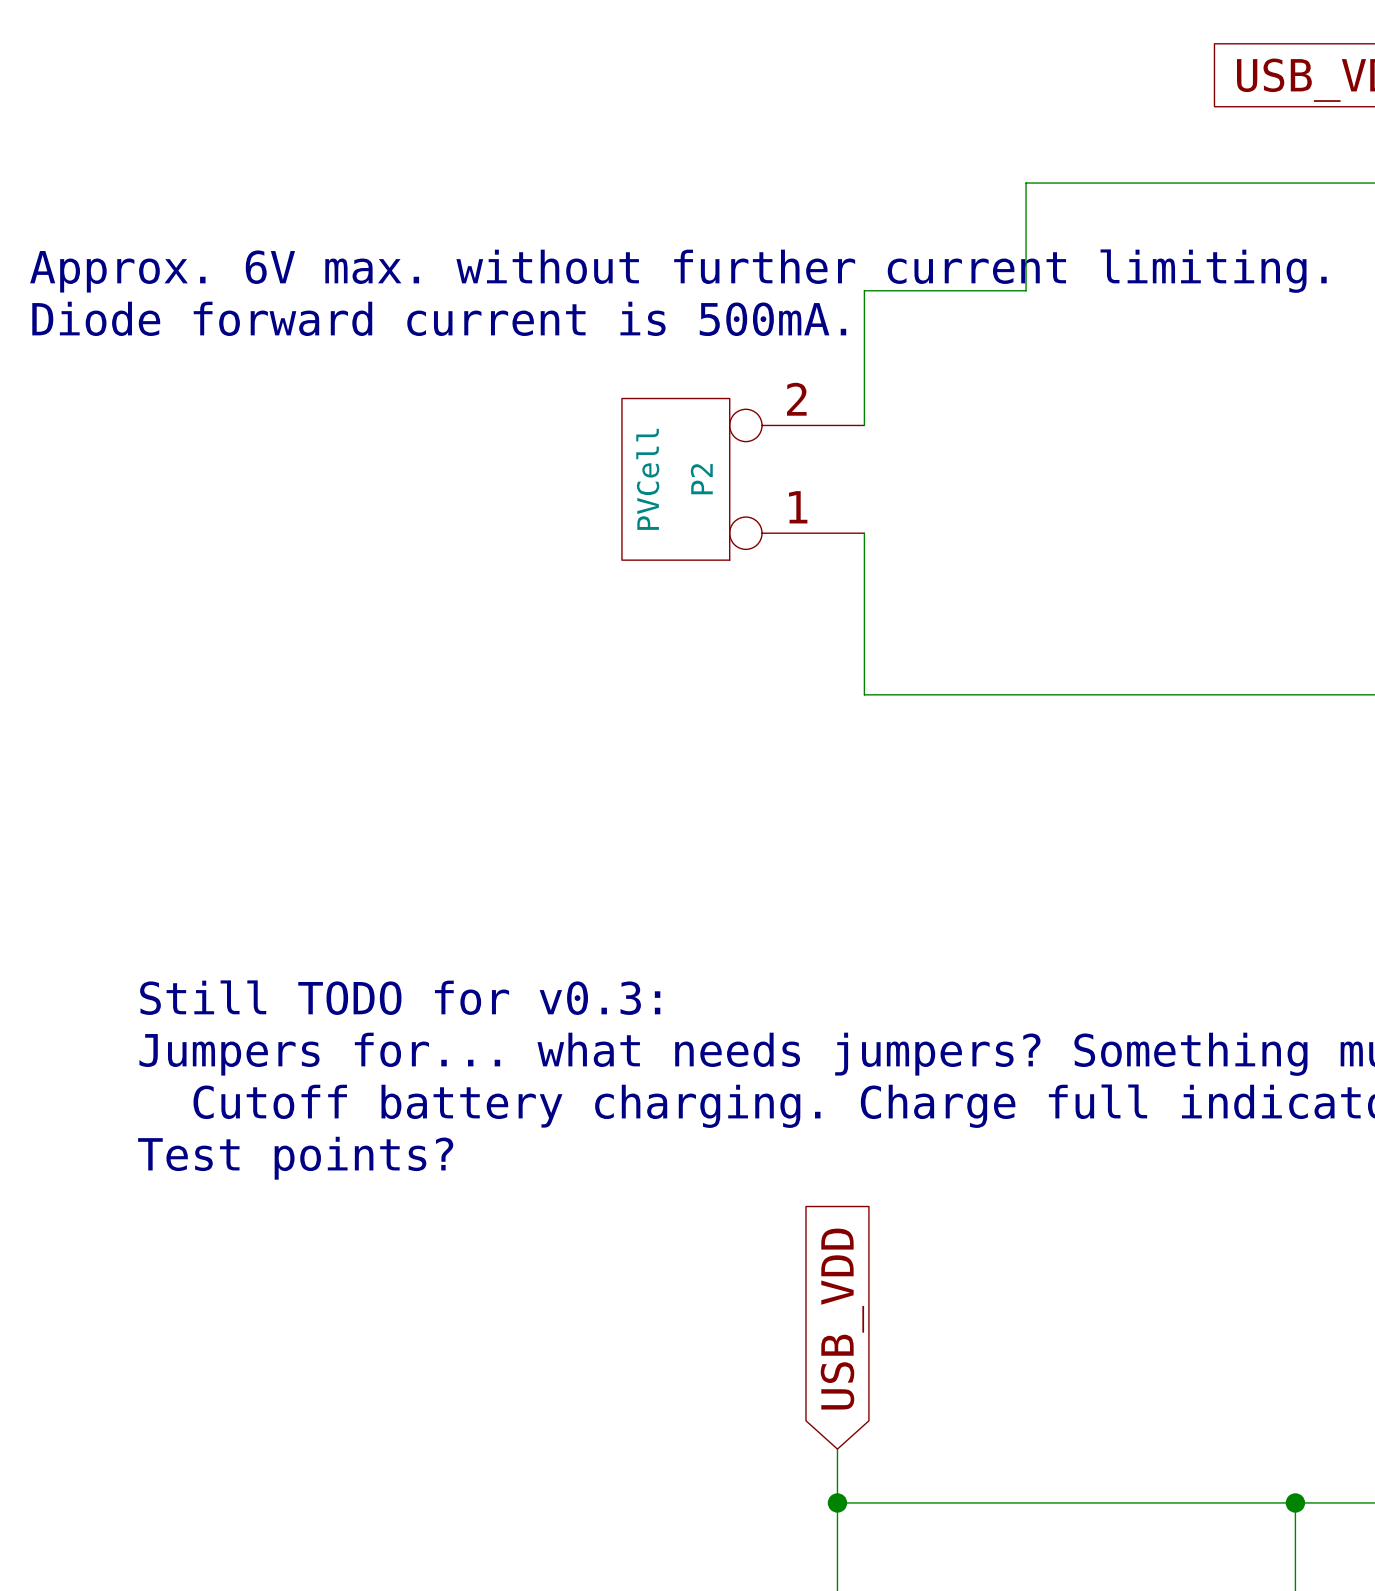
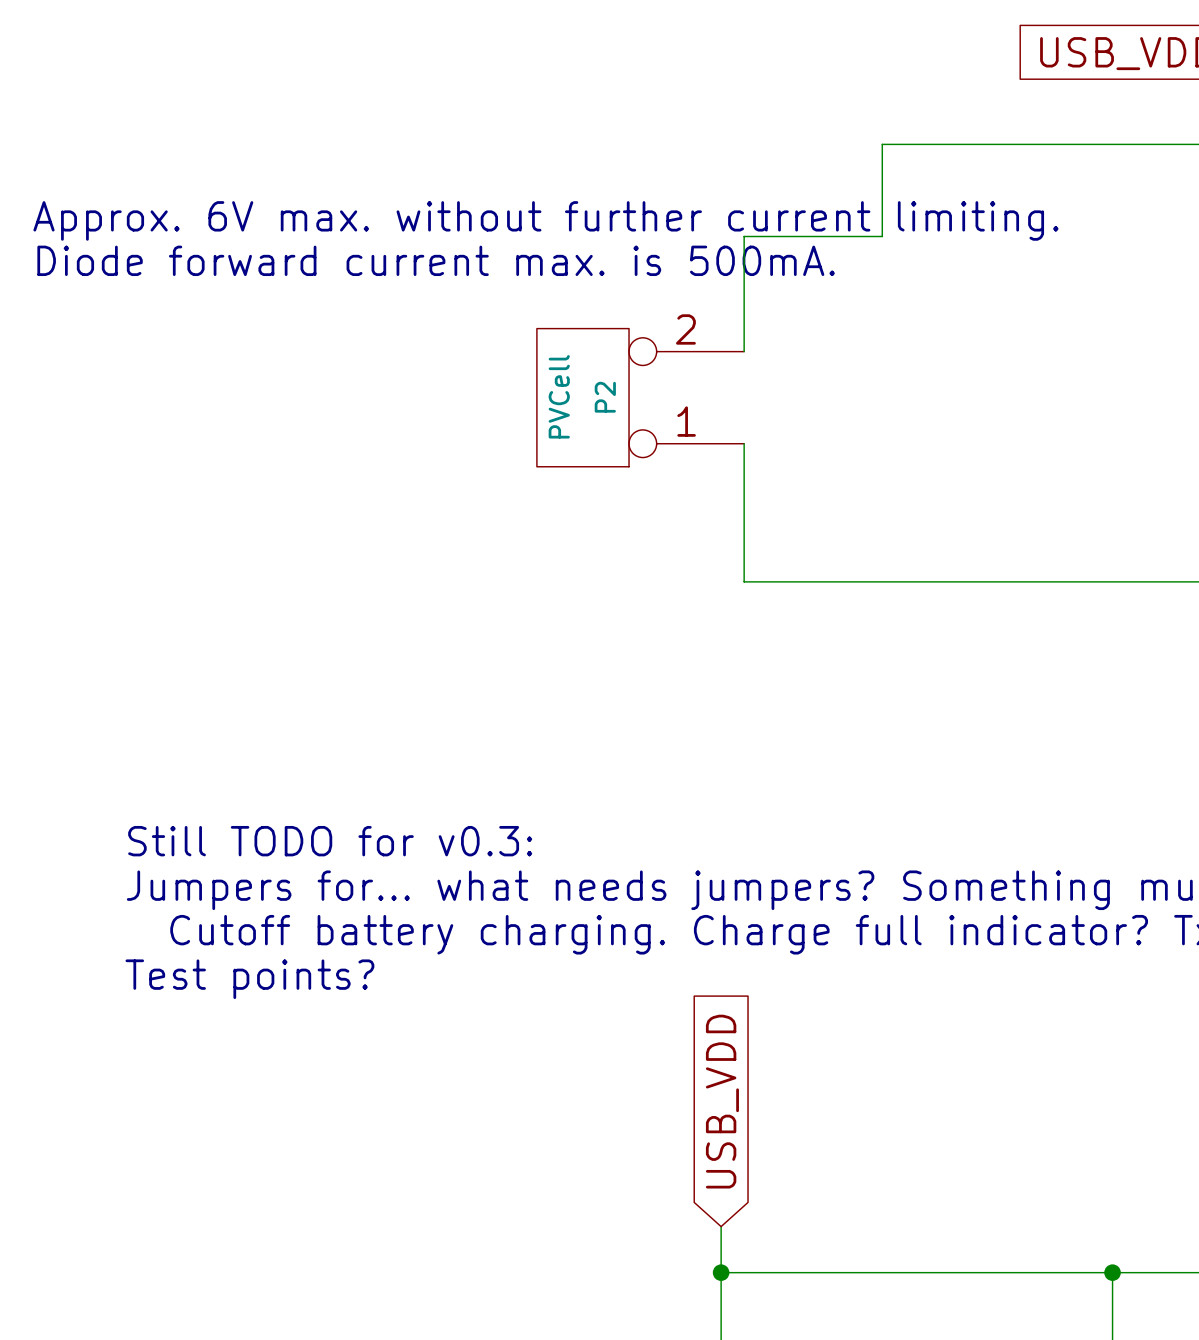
text: Diode forward current is 500mA. (439, 318) -> Diode forward current max. is 500mA. (436, 260)

